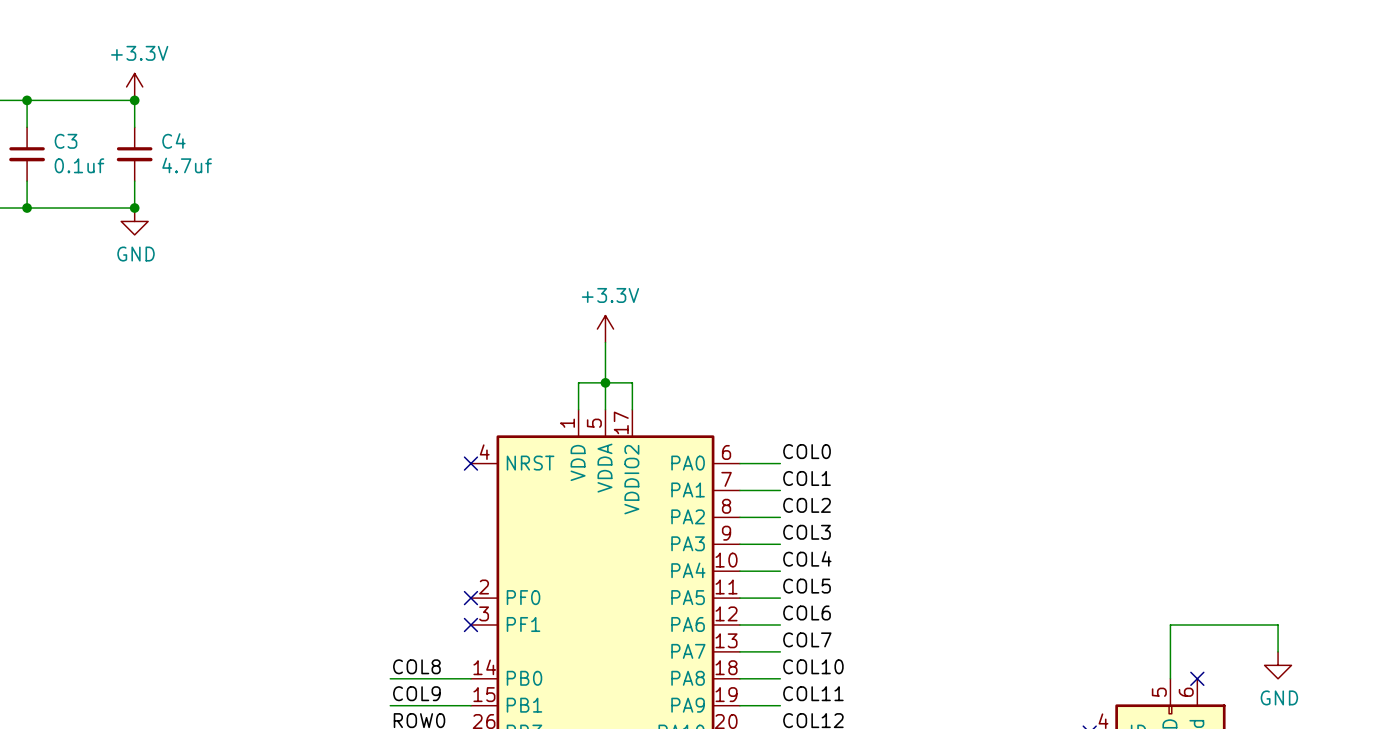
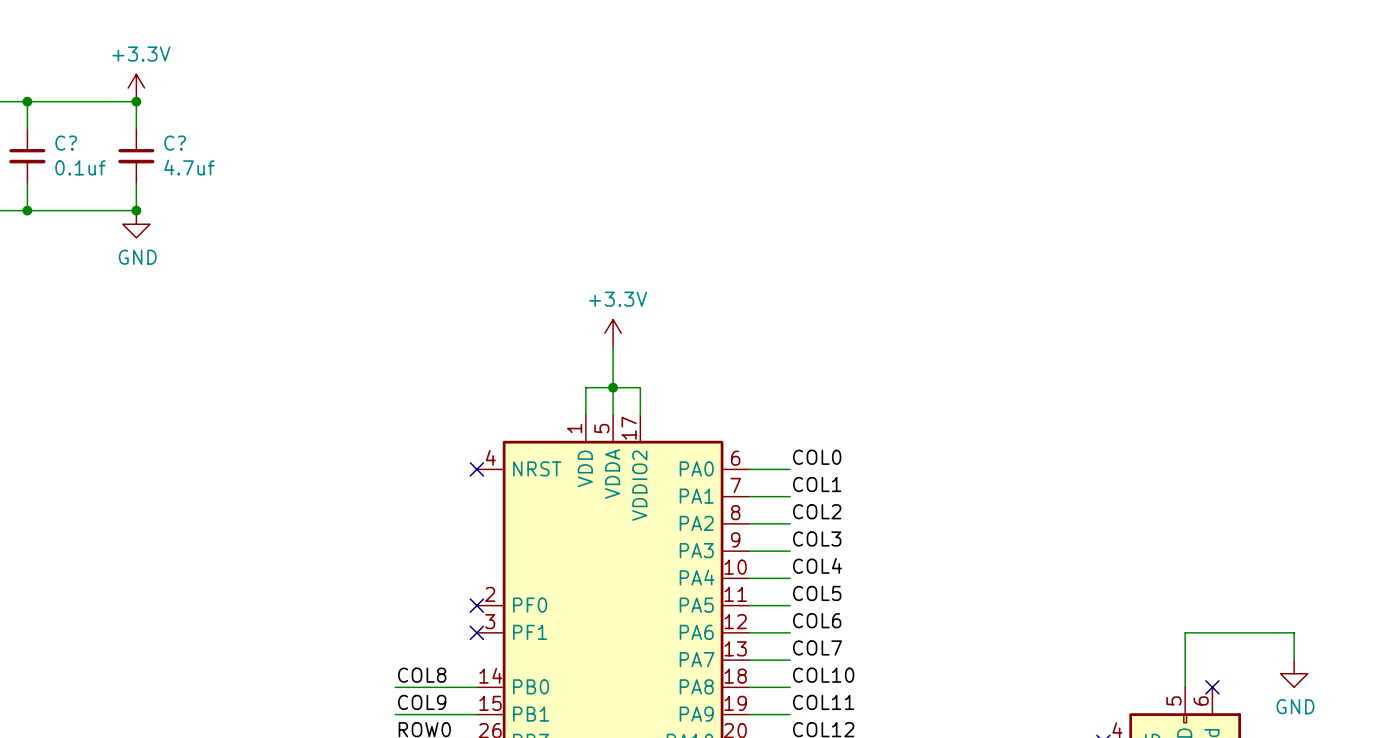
C3 name: C3 (66, 141) -> C? (66, 143)
C4 name: C4 (173, 141) -> C? (175, 143)

